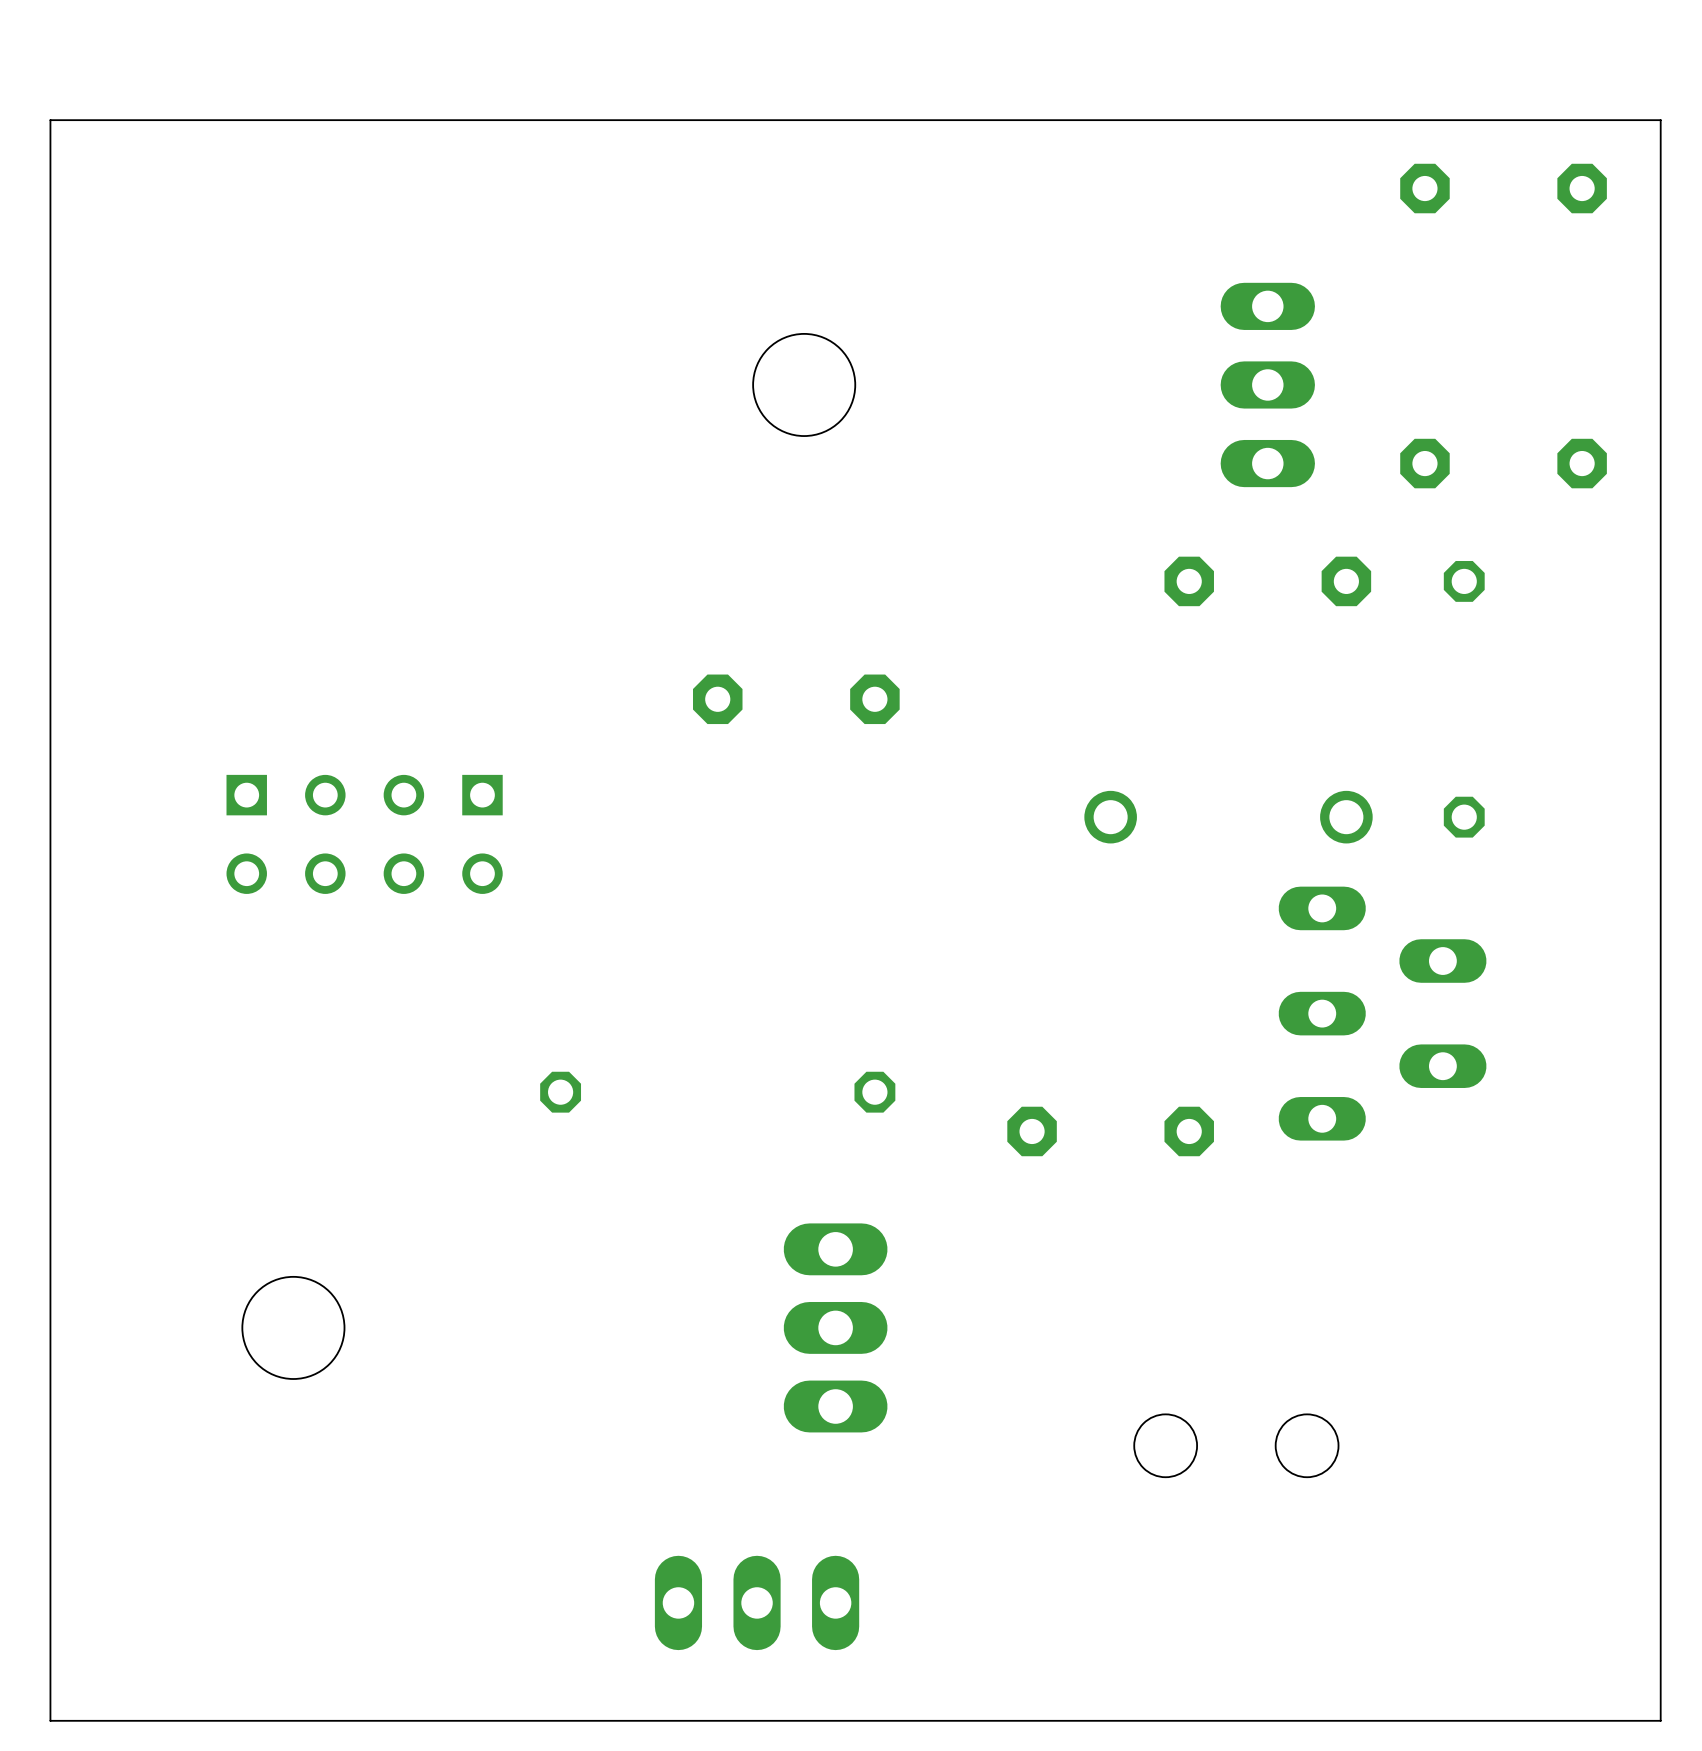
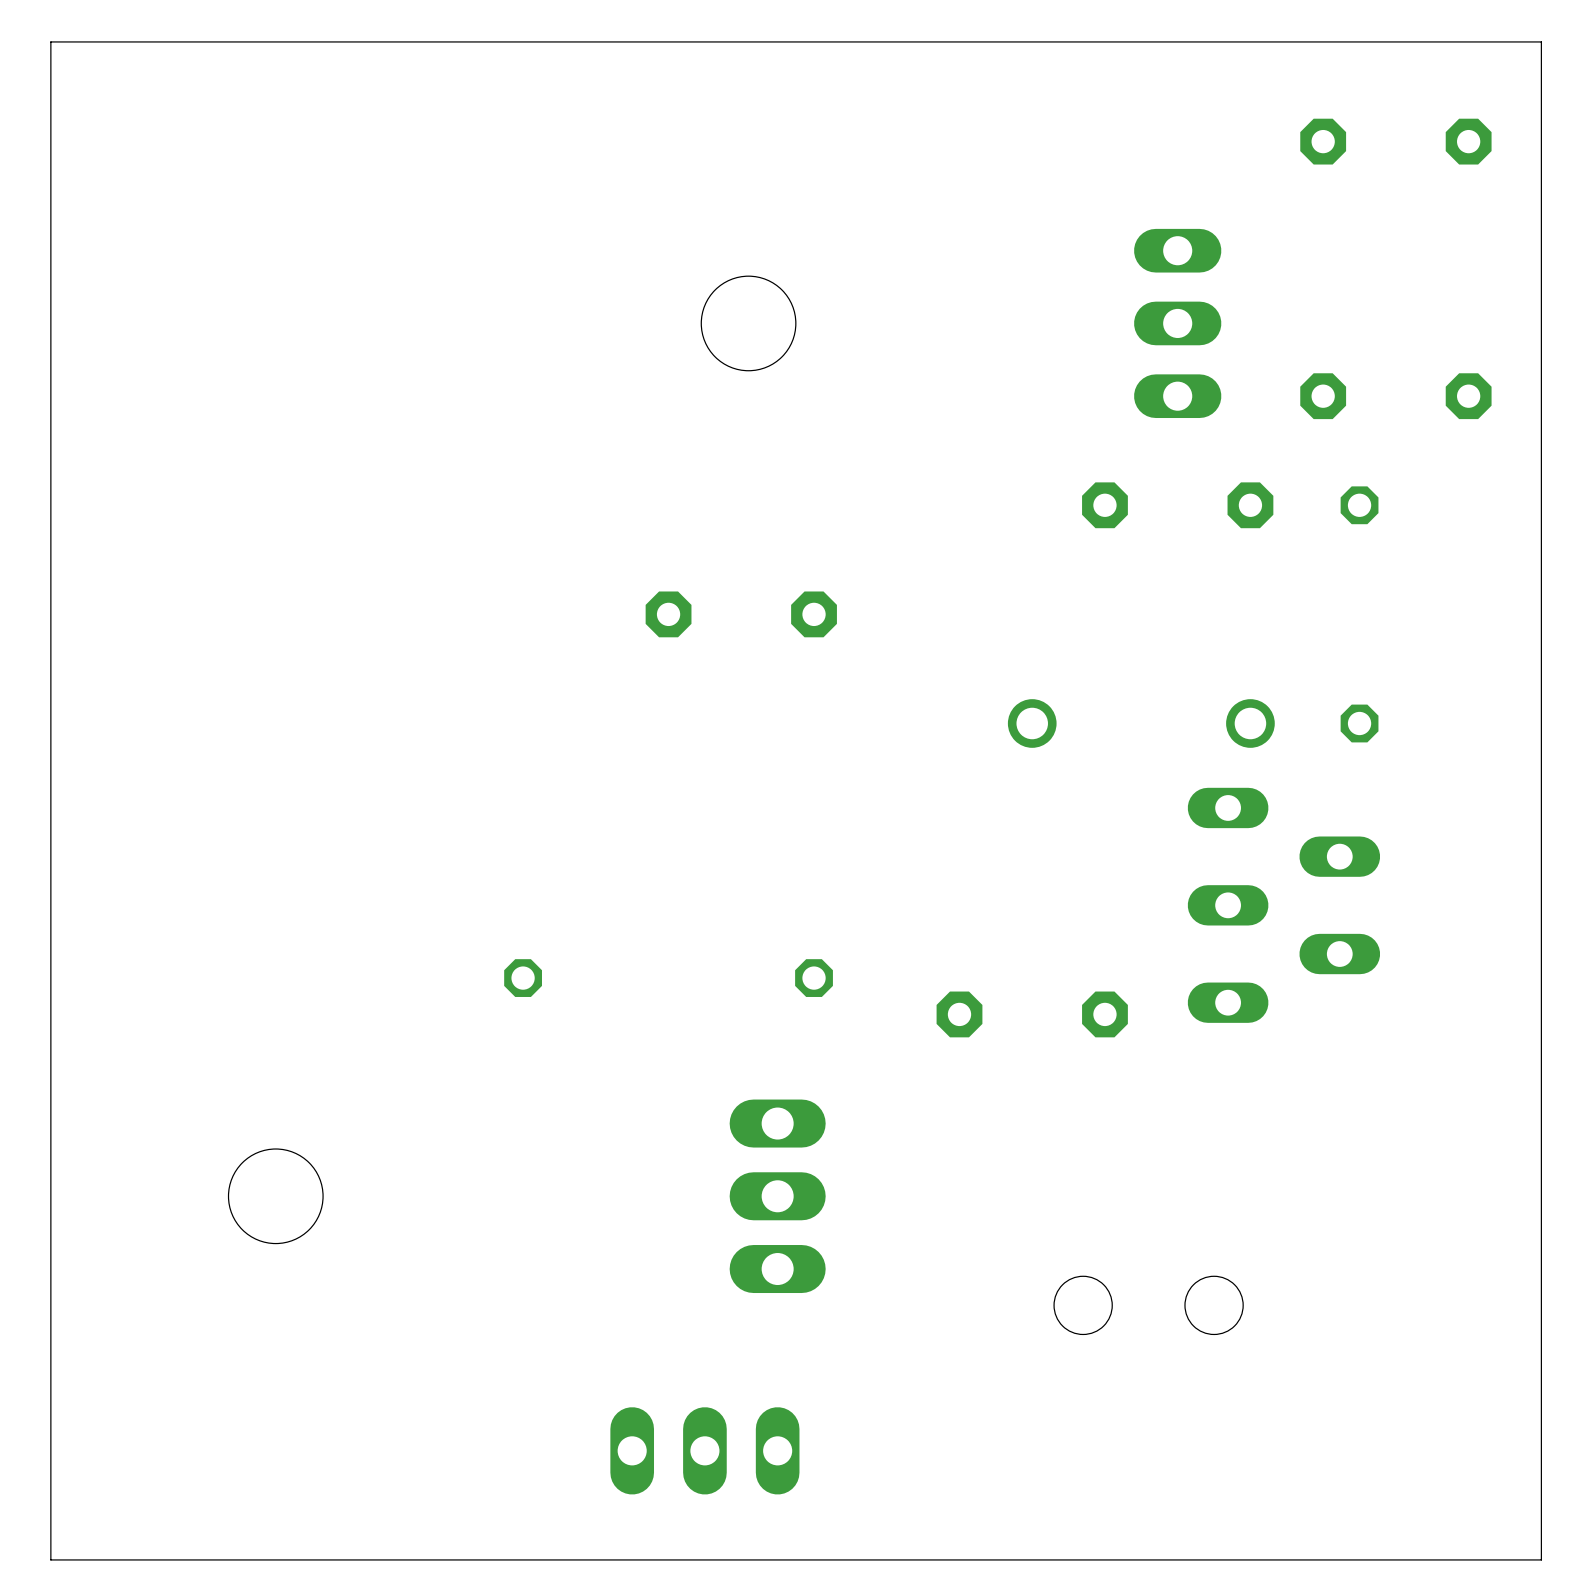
board edge: (1660, 120) (50, 120) -> (1541, 78) (1541, 41) (50, 41) (50, 78)
part: (364, 834) -> none

